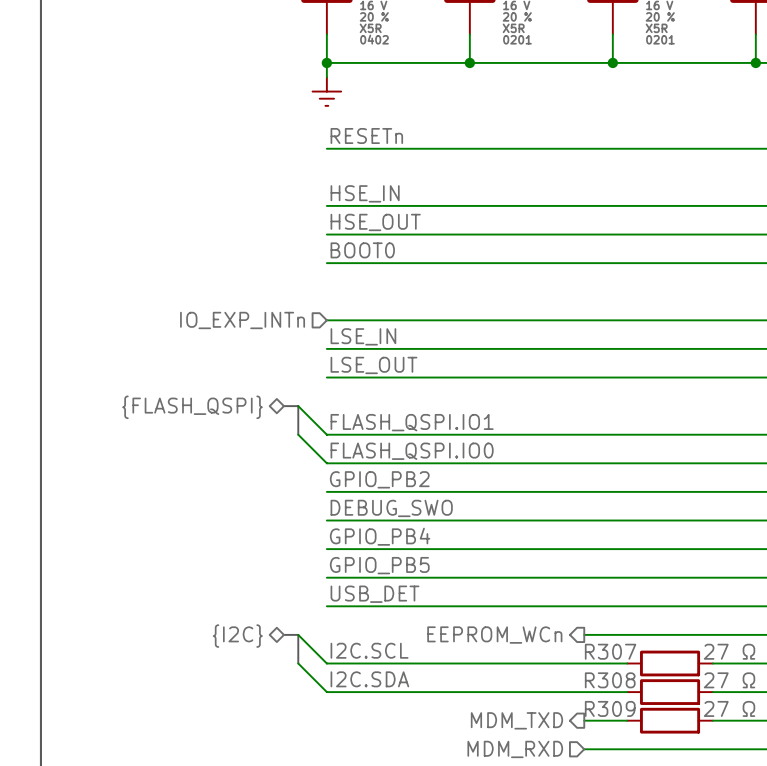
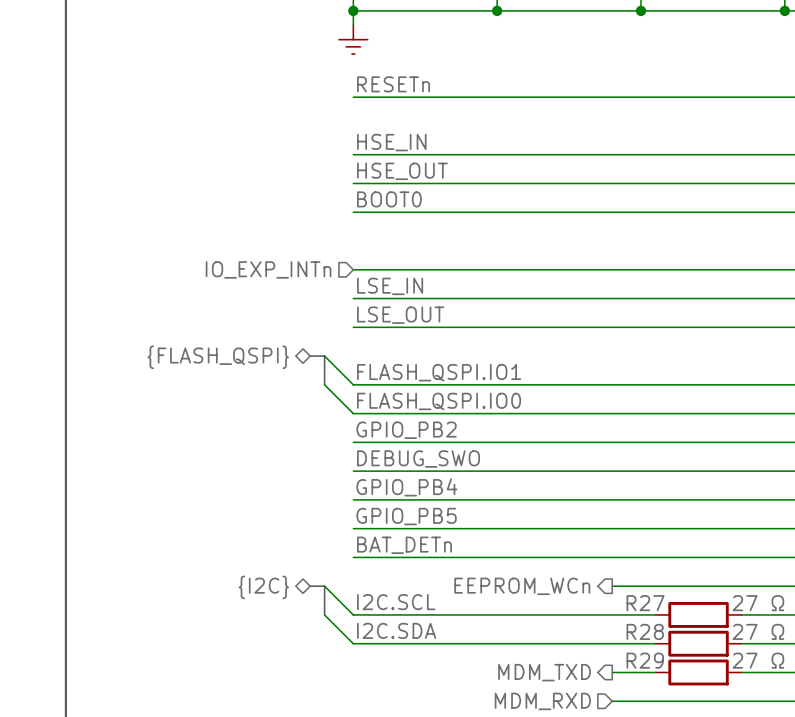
label: USB_DET (374, 594) -> BAT_DETn (404, 545)
R307 name: R307 (610, 651) -> R27 (645, 603)
R308 name: R308 (610, 680) -> R28 (645, 631)
R309 name: R309 (610, 708) -> R29 (645, 660)

